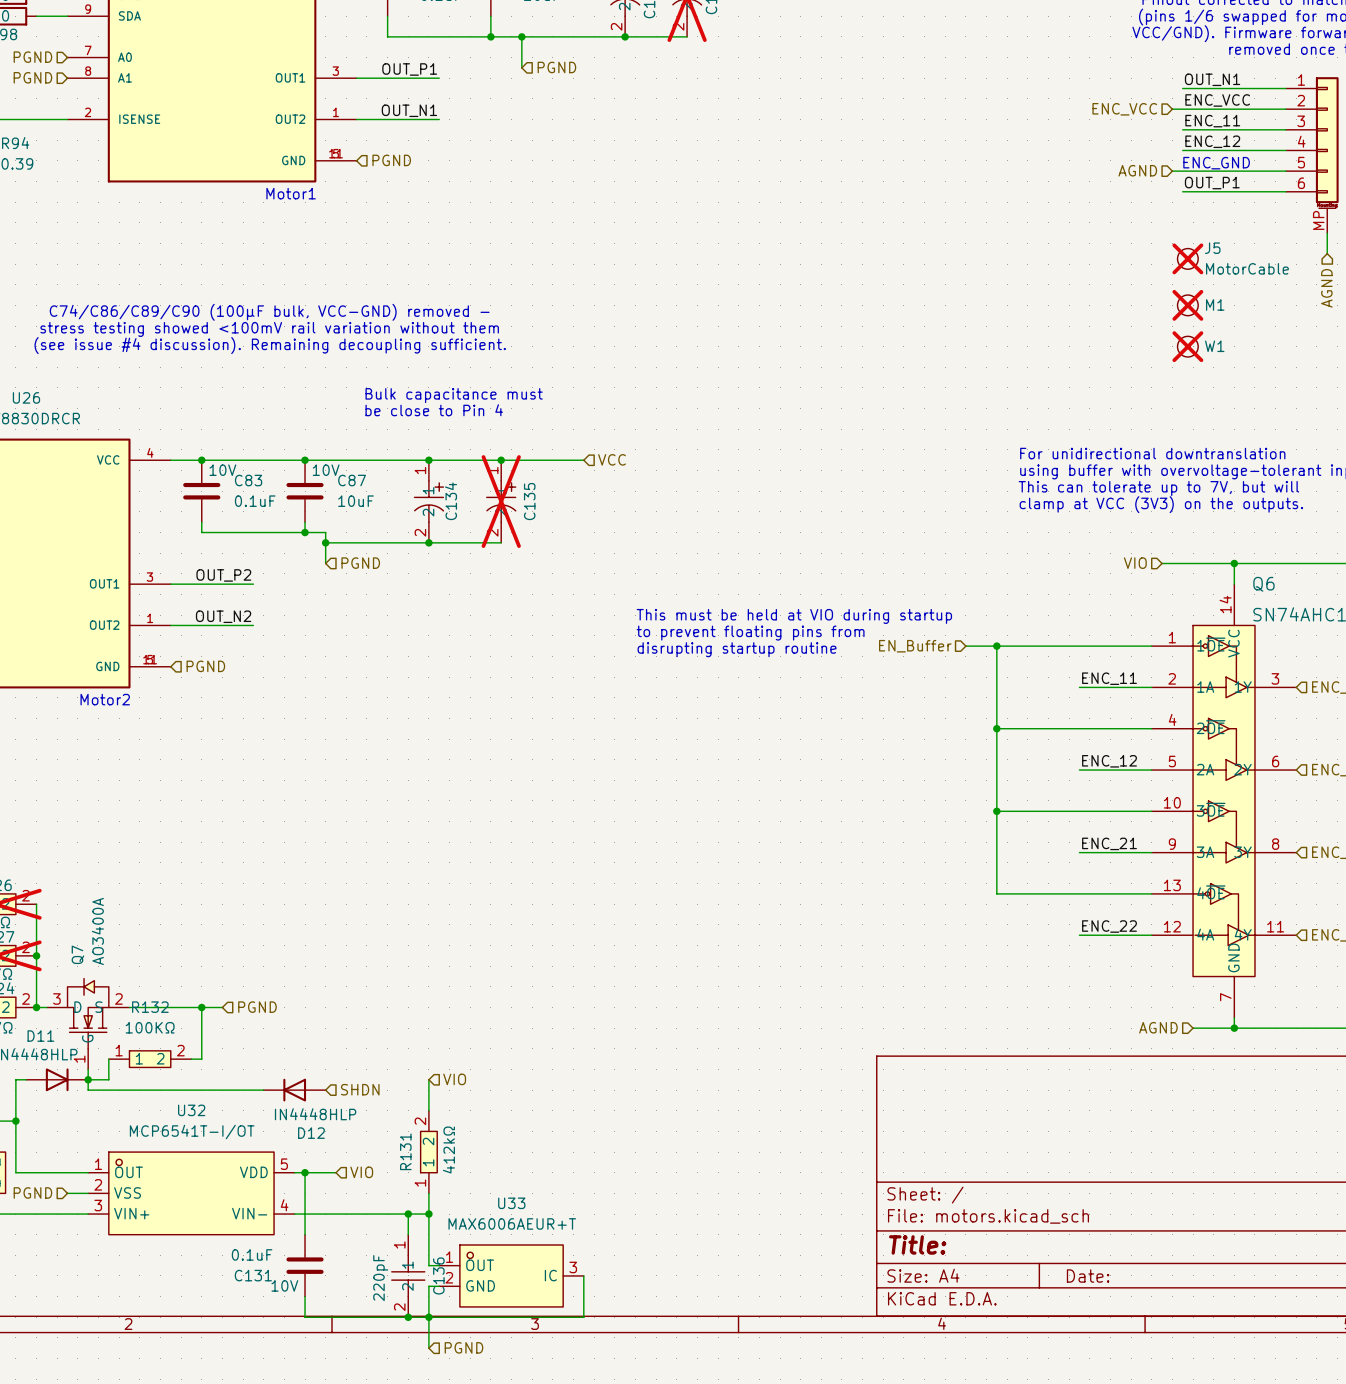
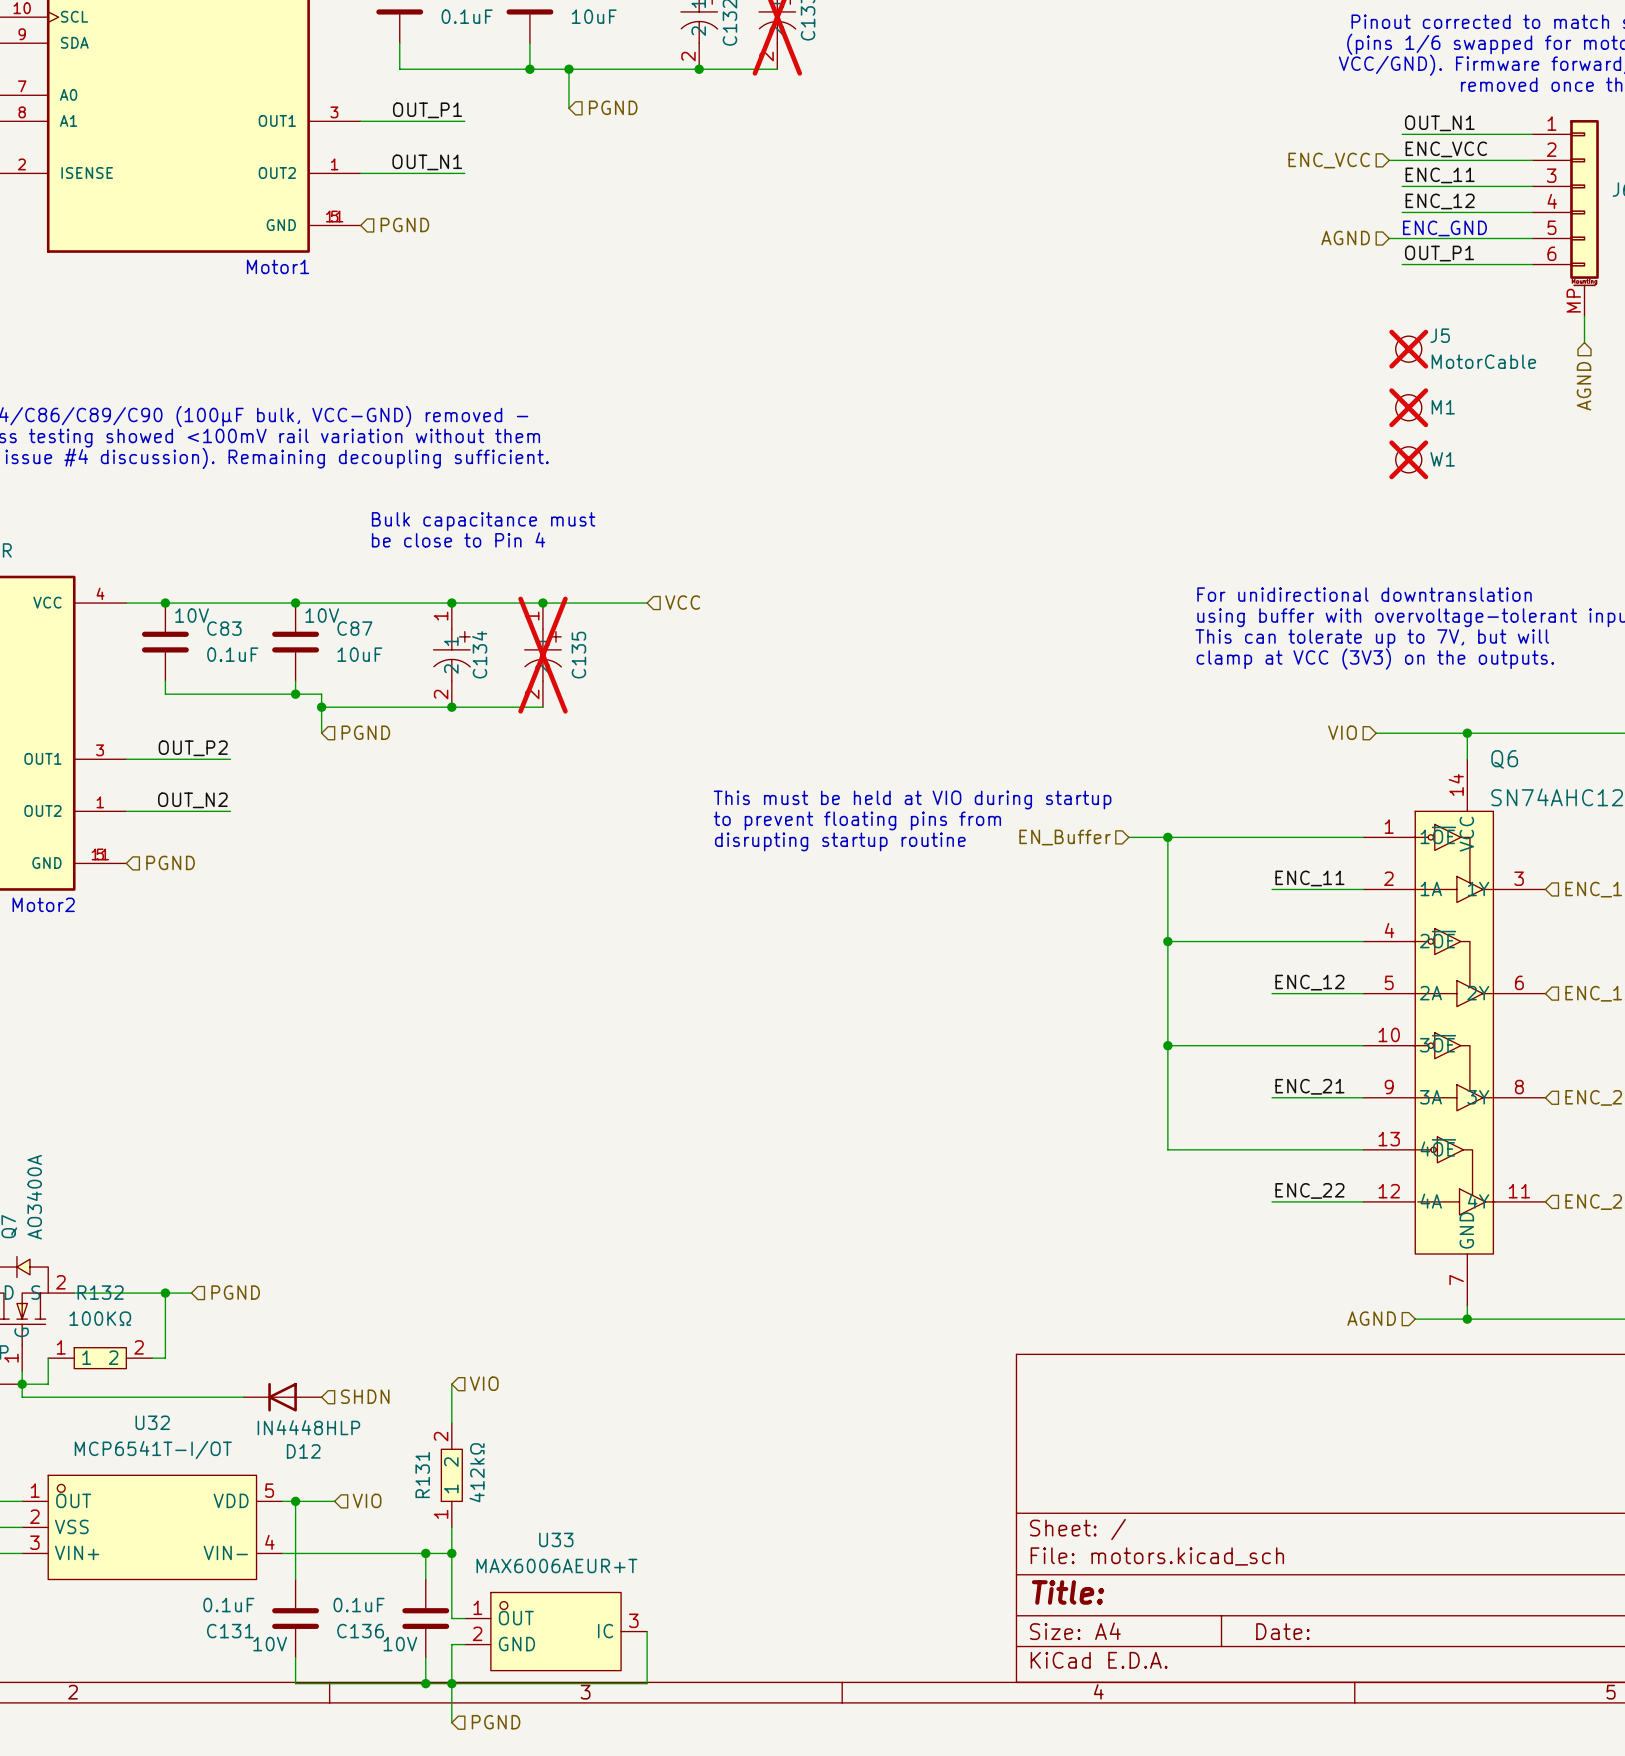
C136 symbol: [391, 1234, 425, 1318] -> [402, 1579, 450, 1658]
C136 name position: C136 (438, 1275) -> C136 (360, 1631)
C136 value: 220pF (380, 1278) -> 0.1uF (359, 1605)
C136 text: none -> 10V (400, 1644)

